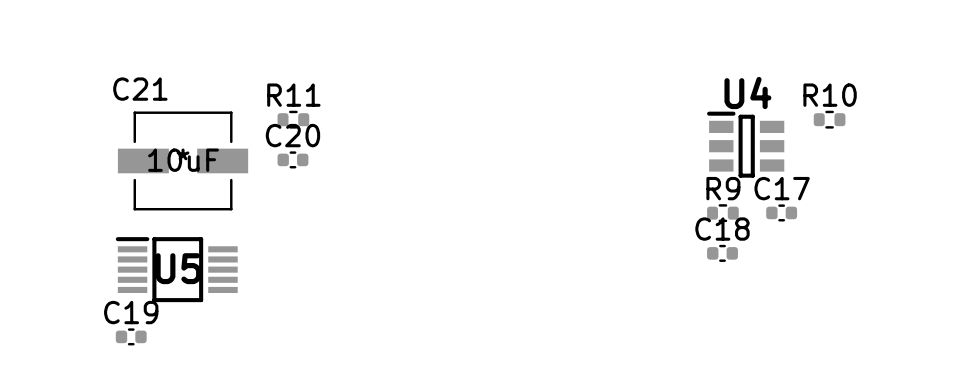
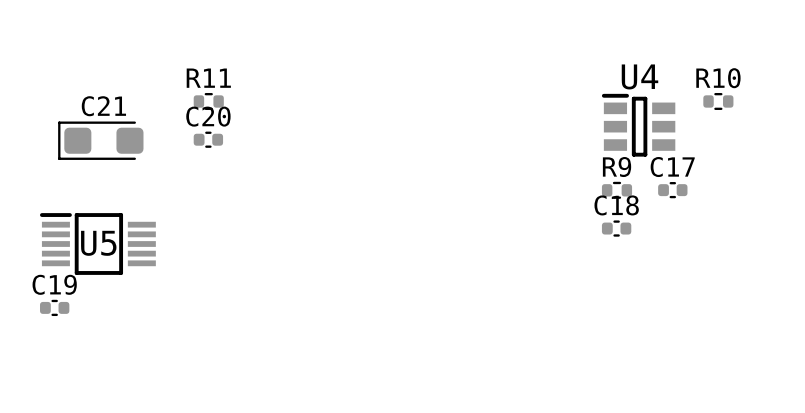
C21 name position: C21 (140, 89) -> C21 (103, 106)
C21 footprint: [117, 111, 249, 211] -> [58, 121, 144, 160]
C21 value: 10uF (183, 160) -> none

